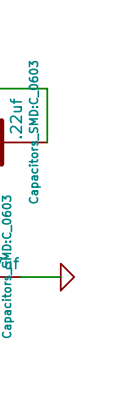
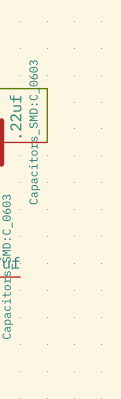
wire: (20, 277) (60, 277) -> none
power symbol: (67, 277) -> none

